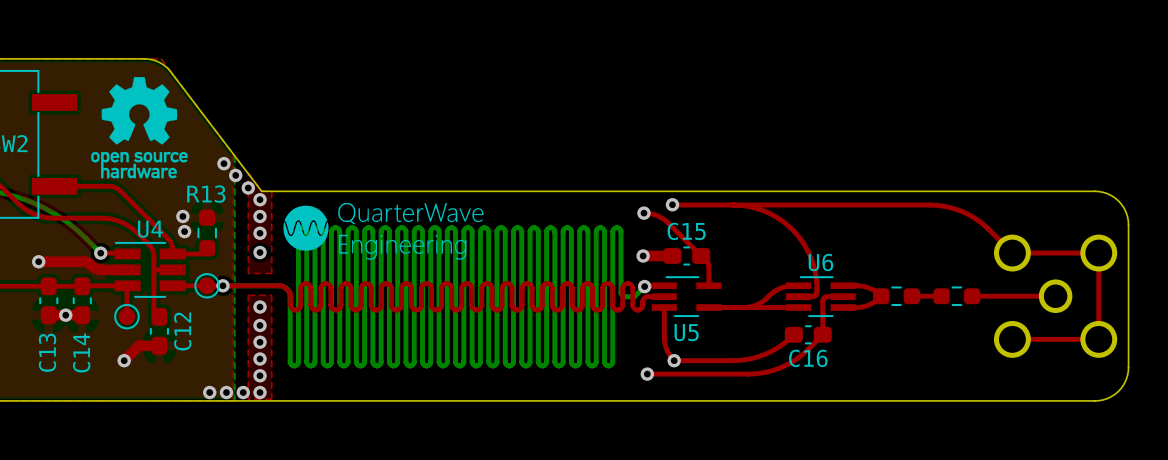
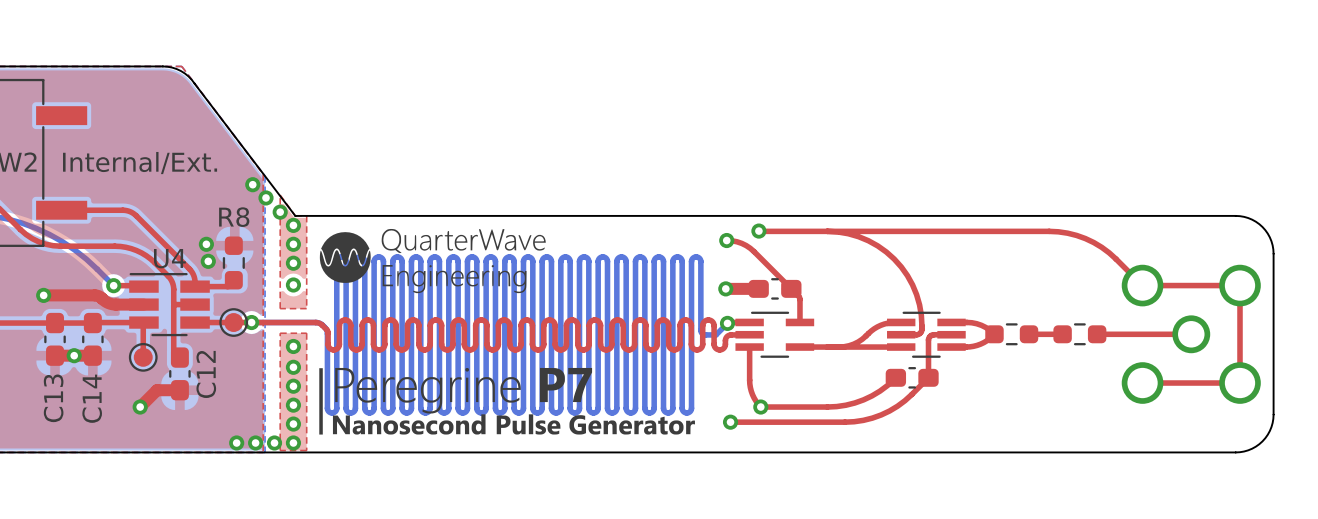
drawing: [91, 77, 188, 179] -> none
text: none -> Internal/Ext. (140, 163)
R13 name: R13 (206, 194) -> R8 (234, 217)
C15 name: C15 (686, 231) -> none
U6 name: U6 (820, 262) -> none
drawing: none -> [319, 367, 695, 435]
U5 name: U5 (686, 332) -> none
C16 name: C16 (808, 358) -> none

